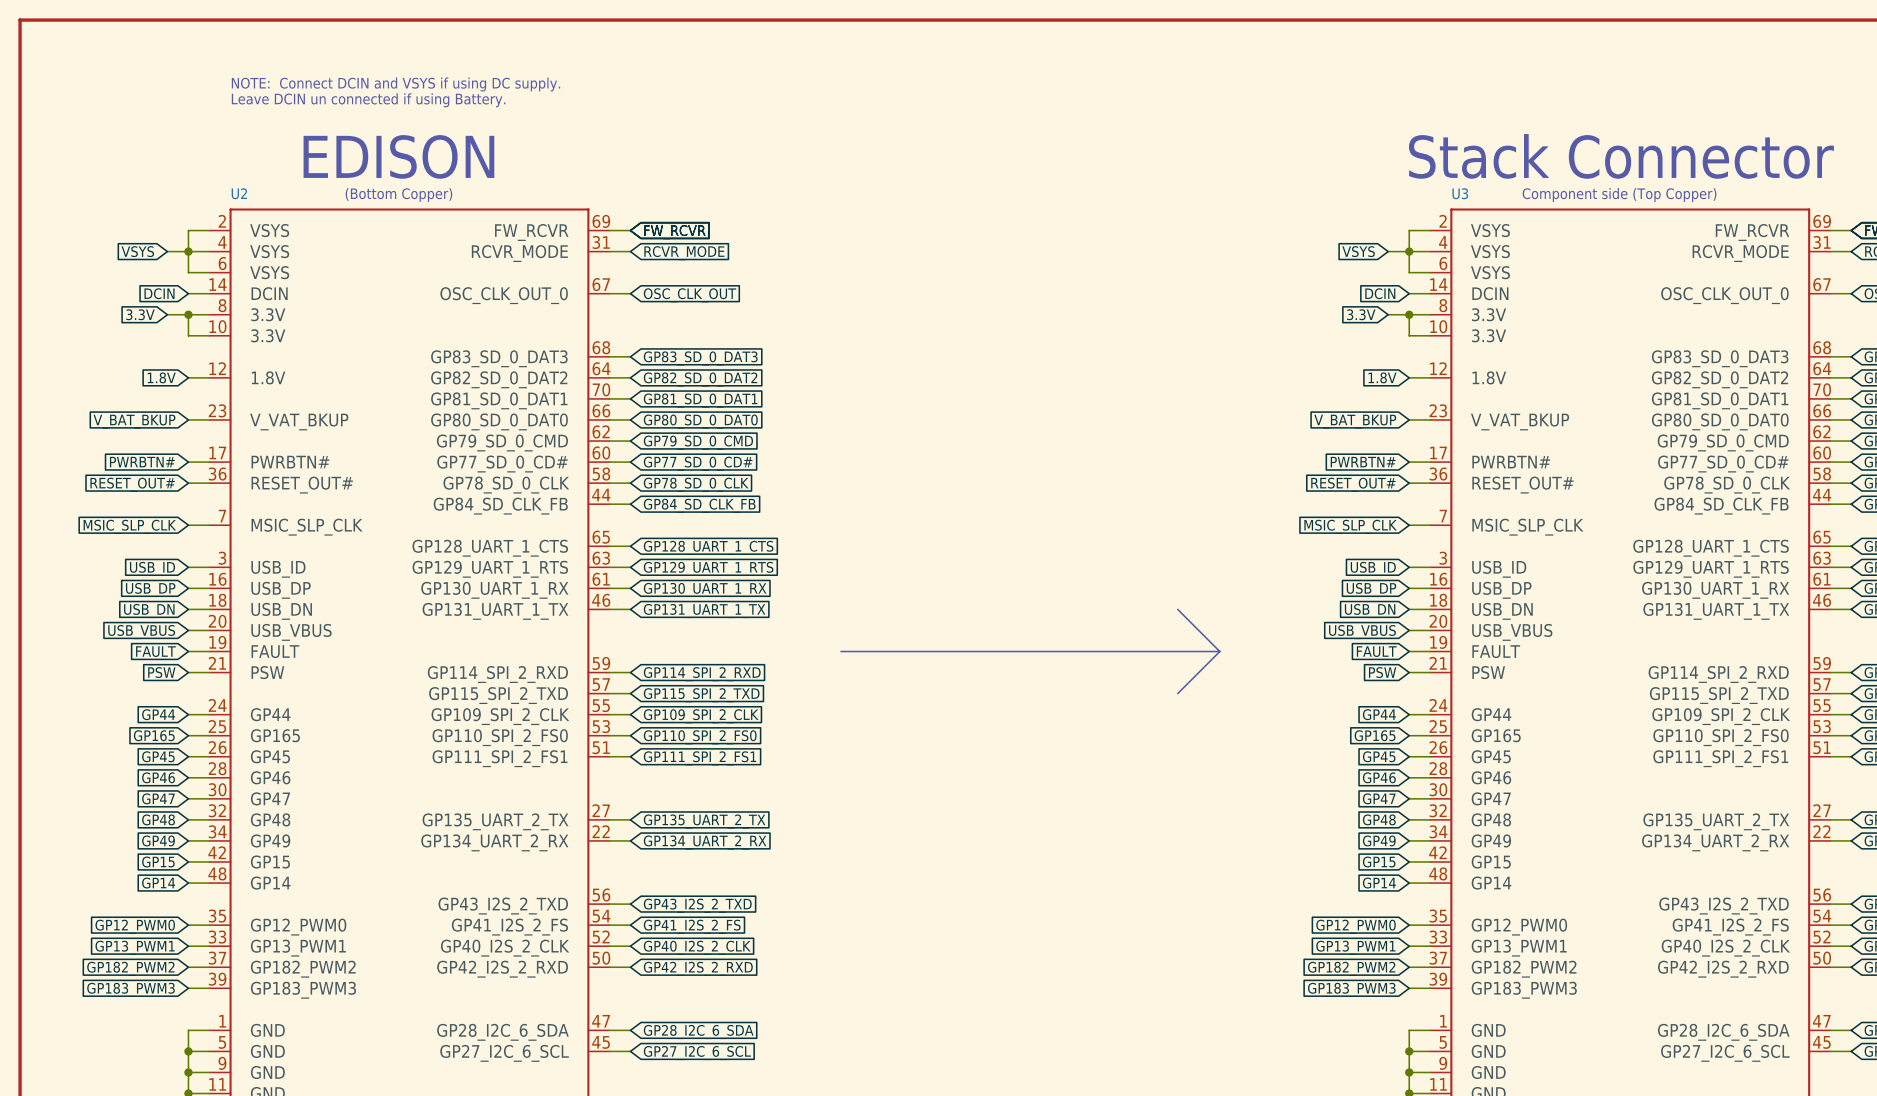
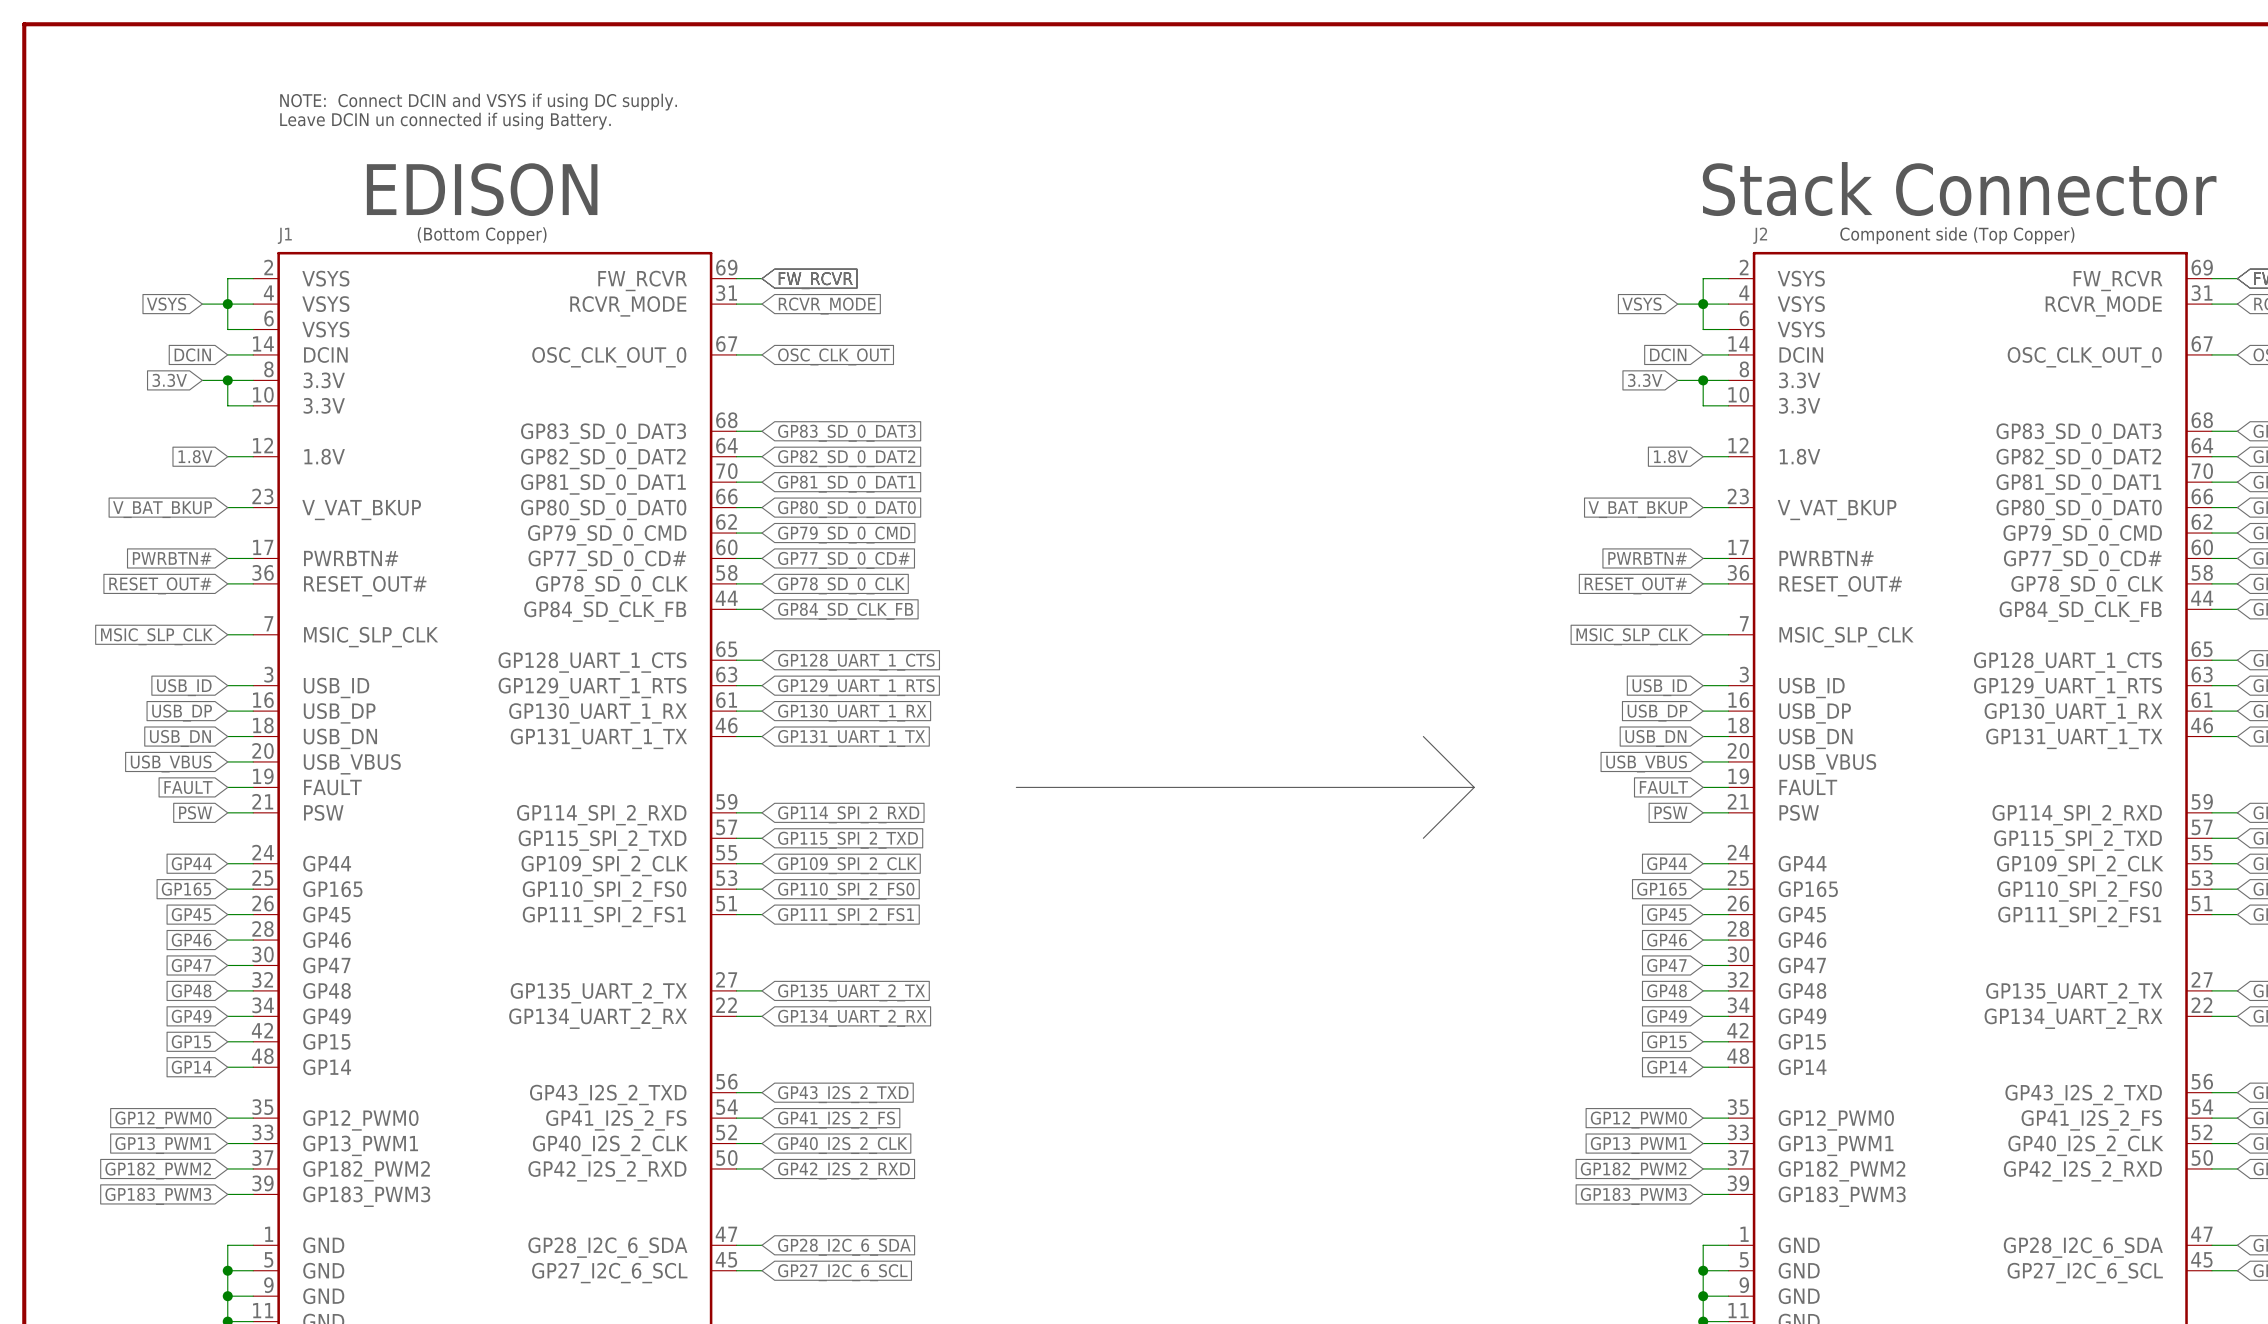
U2 name: U2 (239, 193) -> J1 (284, 235)
U3 name: U3 (1460, 193) -> J2 (1760, 235)

